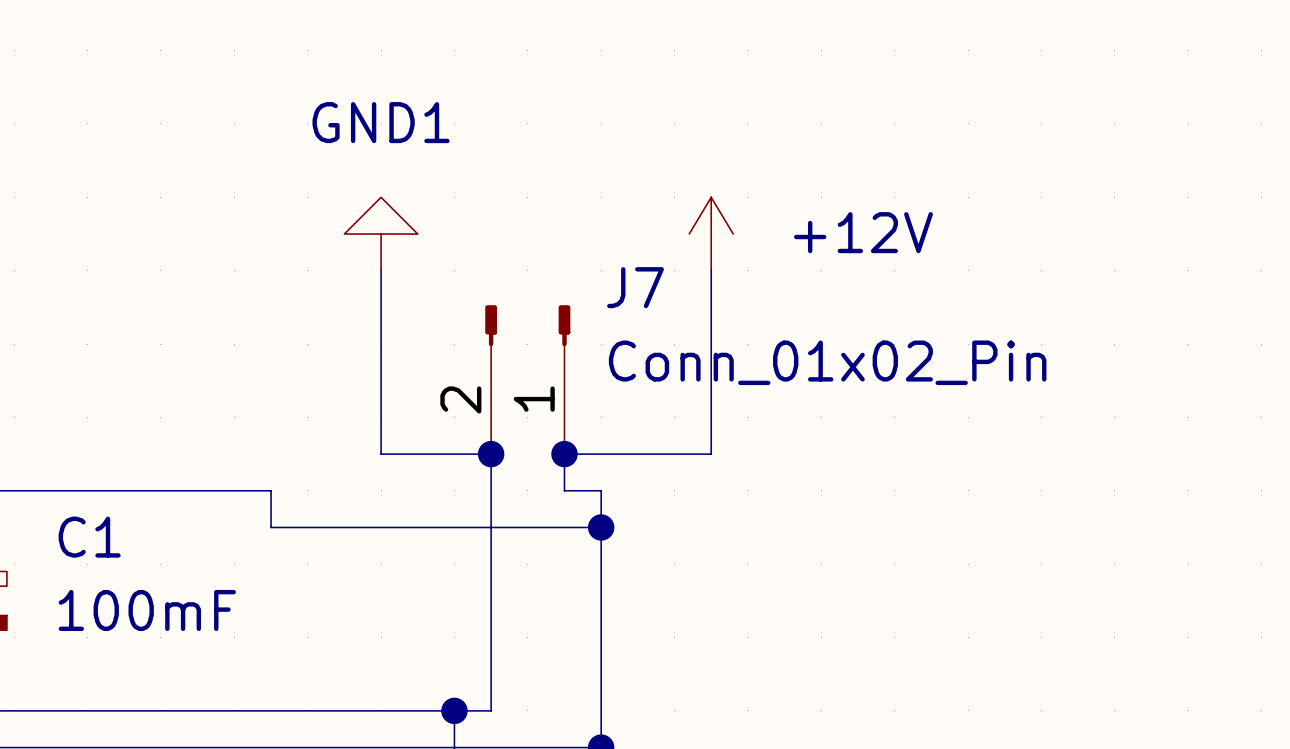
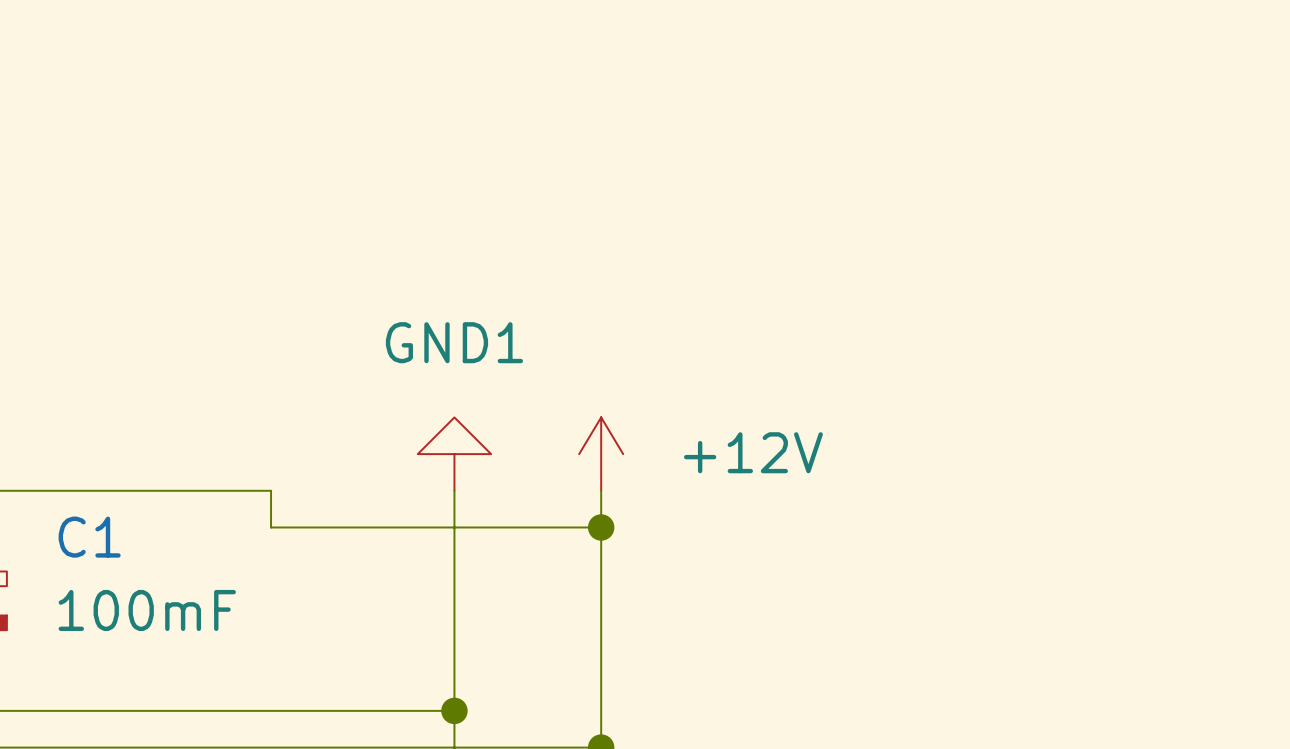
power symbol position: GND1 (381, 234) -> GND1 (454, 454)
power symbol position: +12V (711, 234) -> +12V (601, 454)
wire: (381, 270) (381, 454) (491, 454) (491, 710) (454, 710) -> (454, 490) (454, 710)
wire: (711, 270) (711, 454) (564, 454) (564, 490) (601, 490) -> none
J7: Conn_01x02_Pin (527, 379) -> none
junction: (491, 454) -> none
junction: (564, 454) -> none

